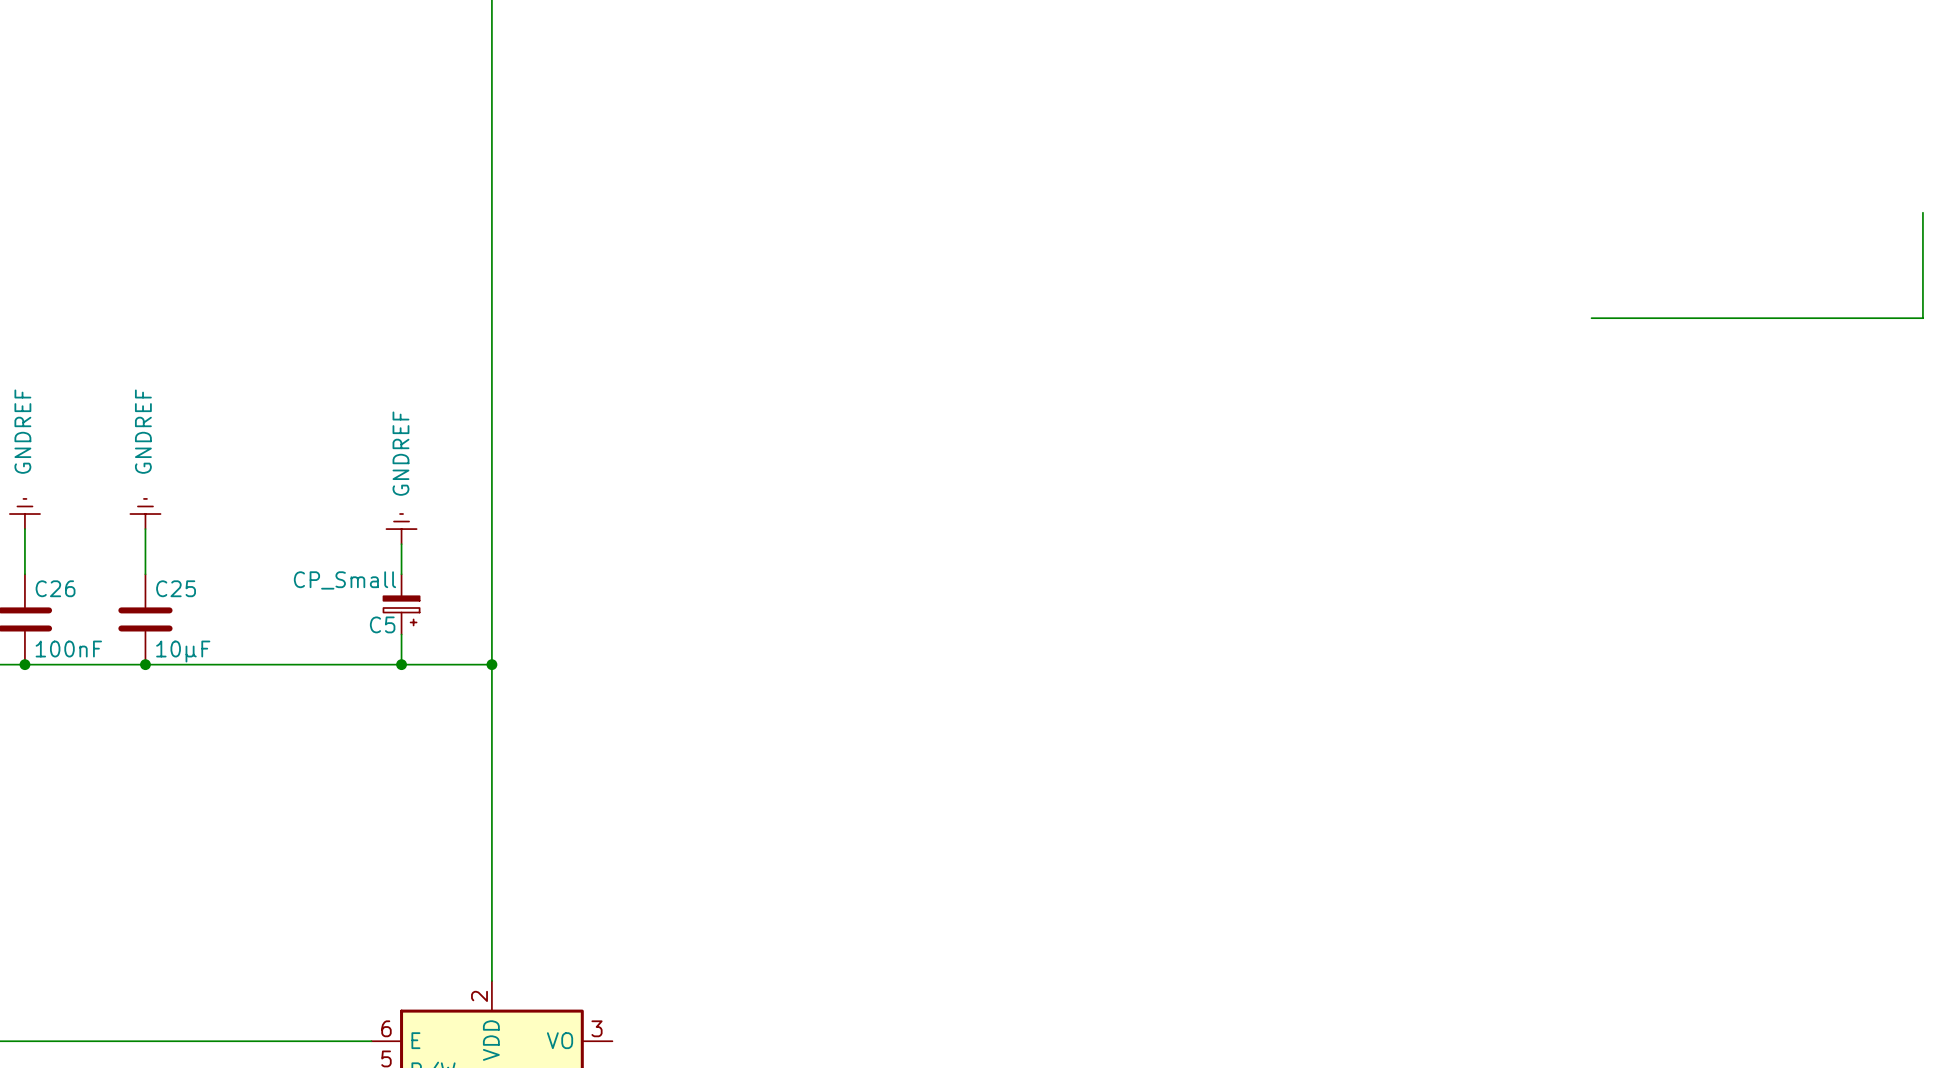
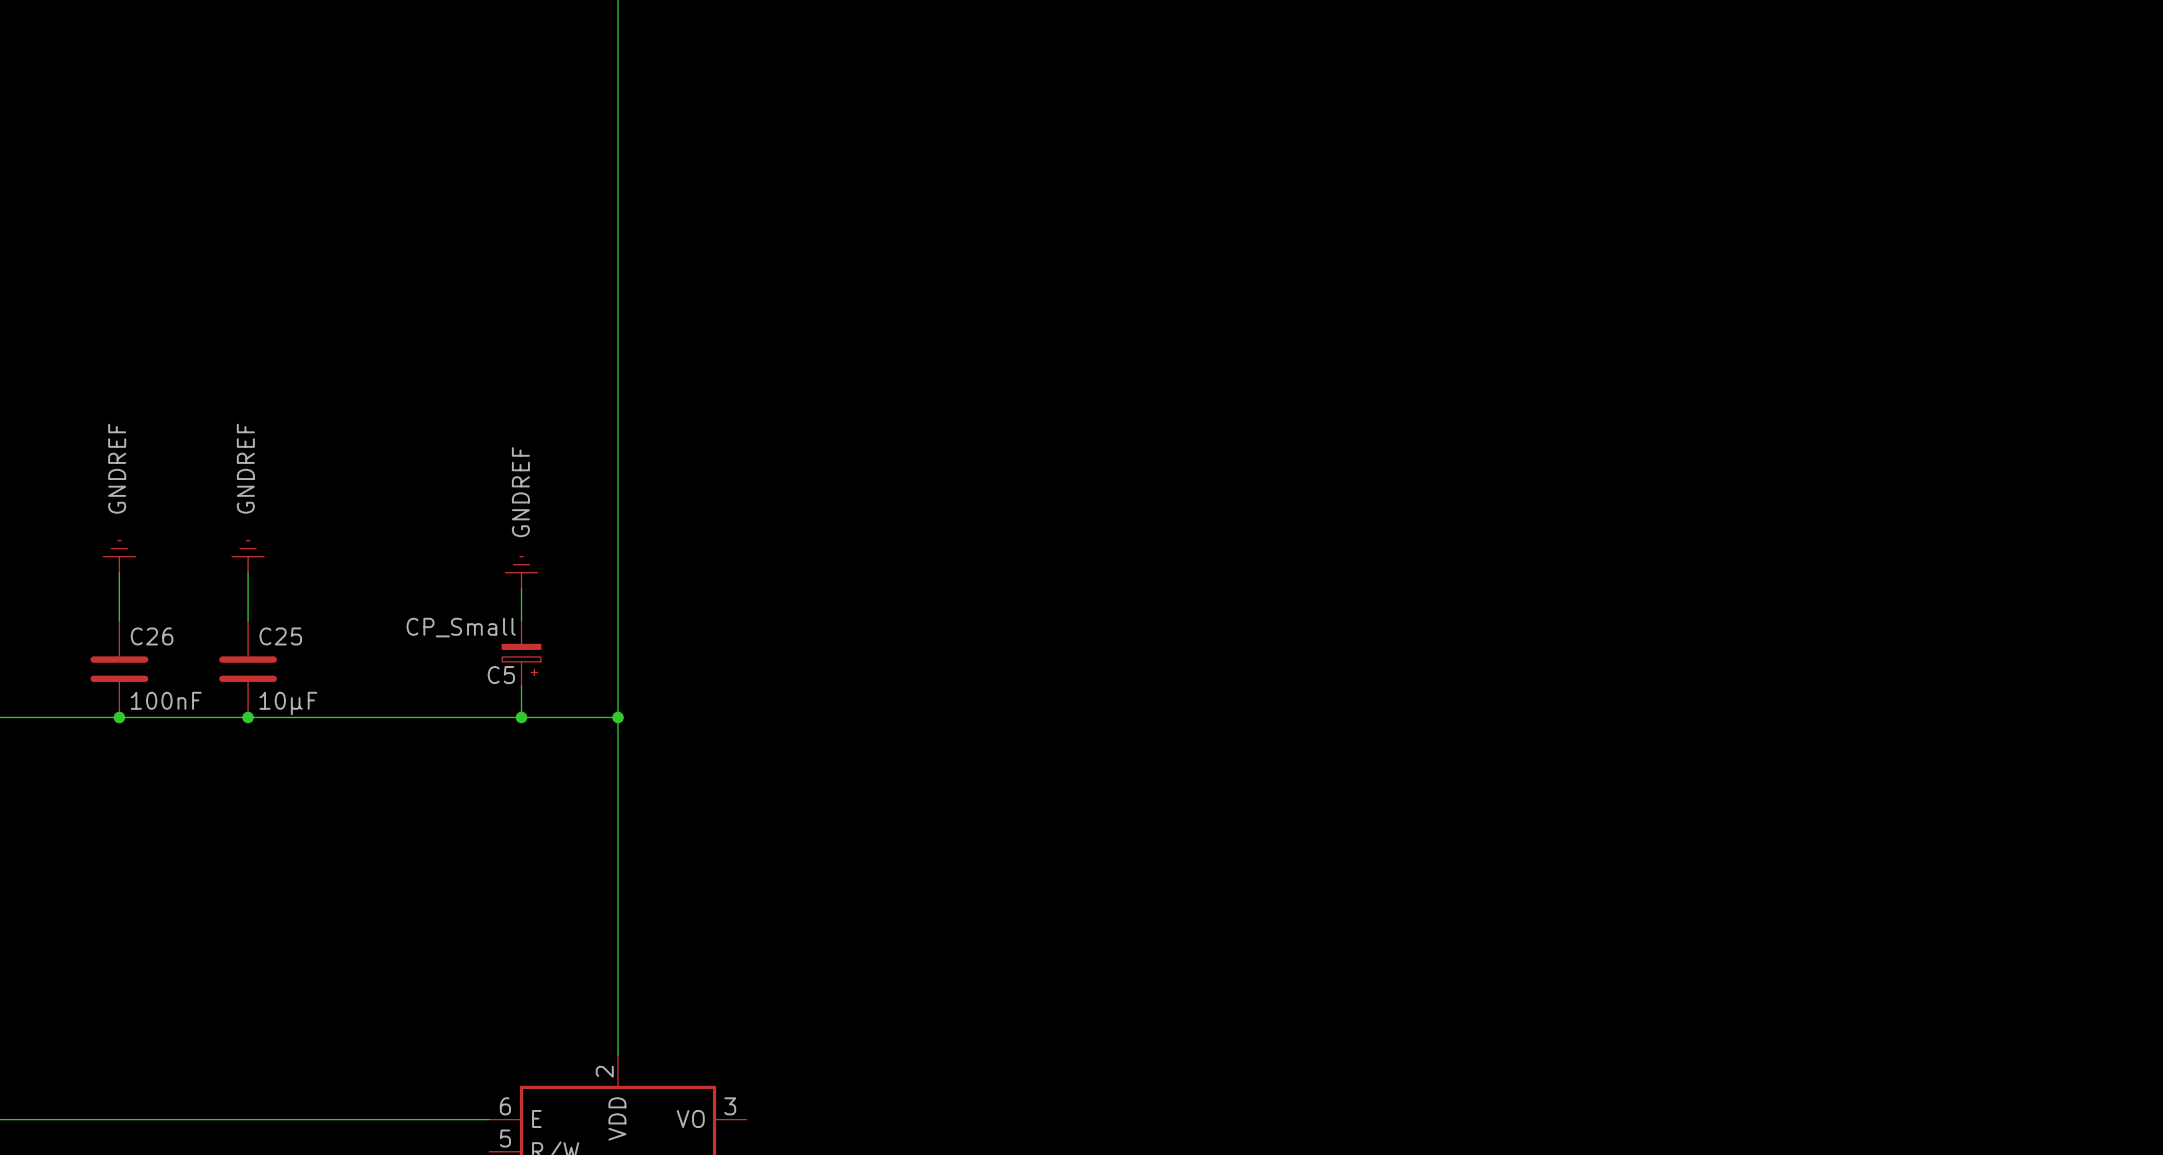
wire: (1922, 212) (1922, 318) (1591, 318) -> none

